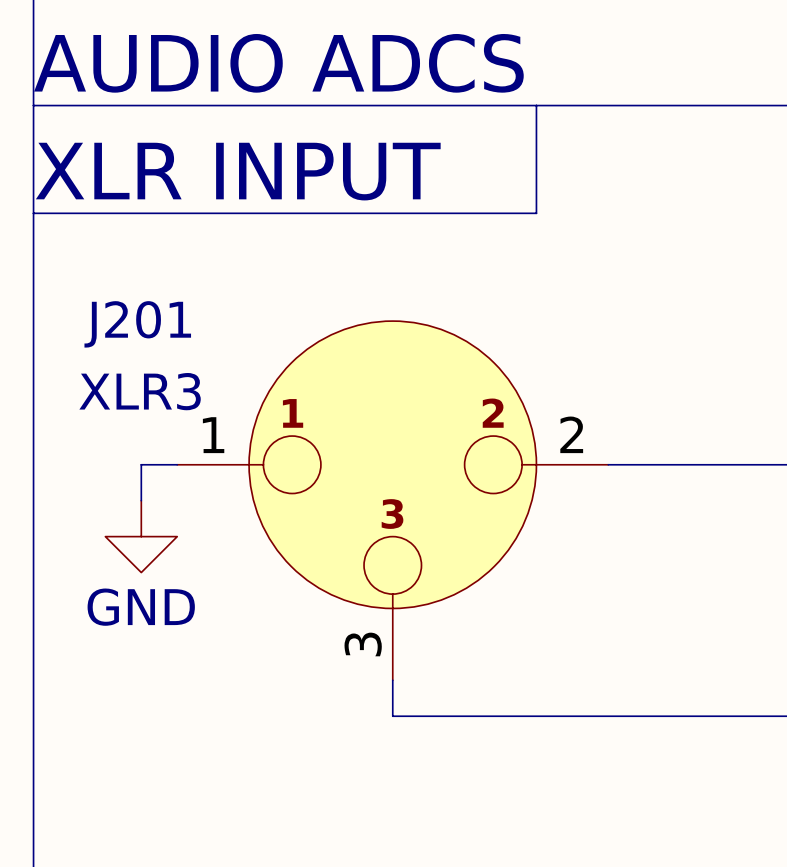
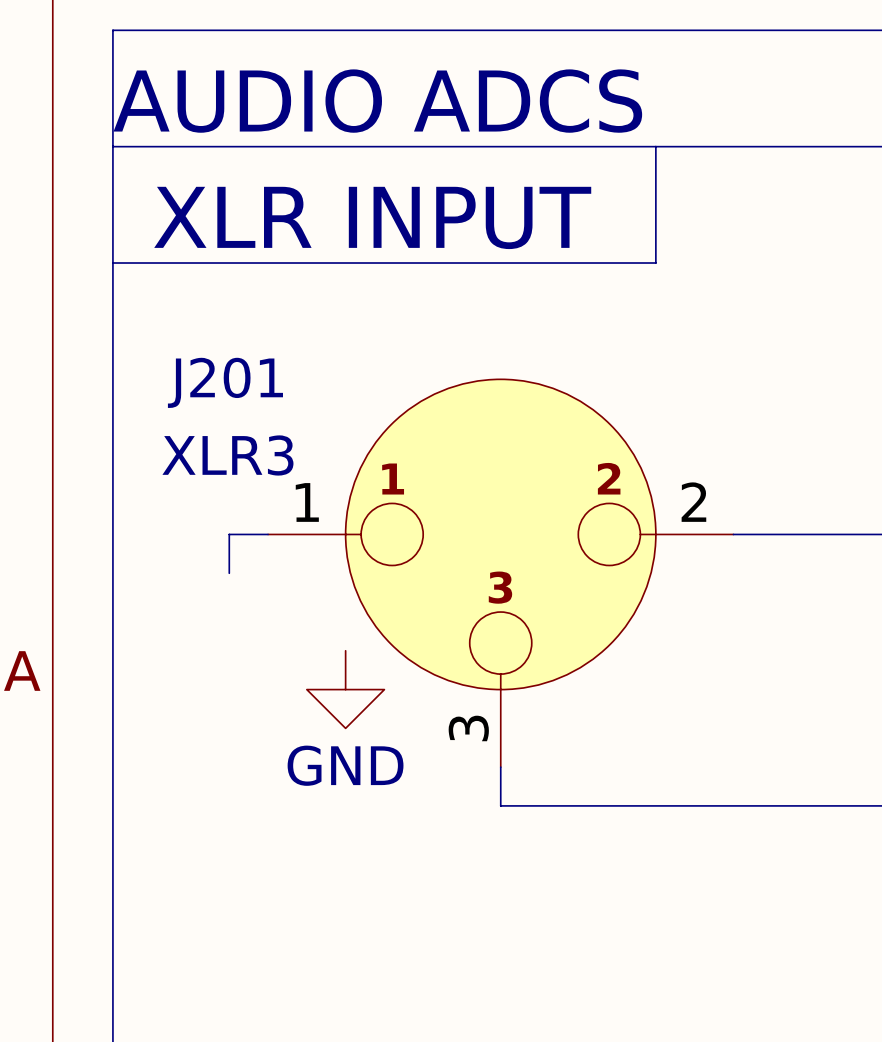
text position: XLR INPUT (238, 171) -> XLR INPUT (372, 217)
power symbol position: GND (141, 536) -> GND (345, 689)

